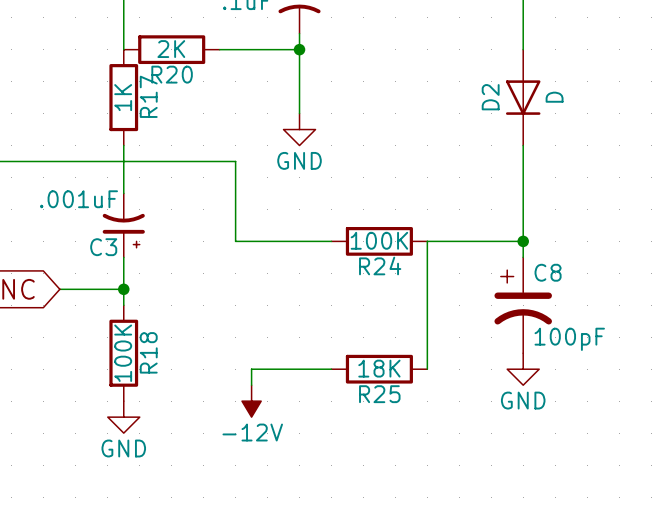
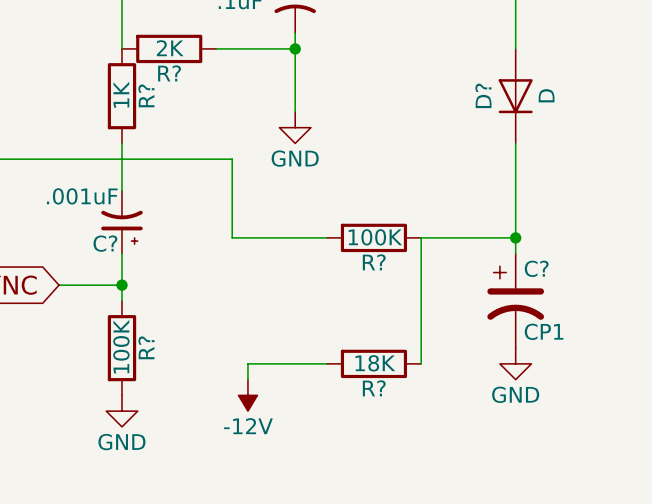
R20 name: R20 (172, 74) -> R? (169, 73)
R17 name: R17 (148, 96) -> R? (146, 95)
D2 name: D2 (490, 97) -> D? (483, 95)
C3 name: C3 (103, 247) -> C? (105, 243)
R24 name: R24 (380, 265) -> R? (374, 262)
C8 name: C8 (548, 272) -> C? (536, 268)
C8 value: 100pF (569, 339) -> CP1 (544, 331)
R18 name: R18 (148, 352) -> R? (146, 347)
R25 name: R25 (379, 394) -> R? (374, 388)

